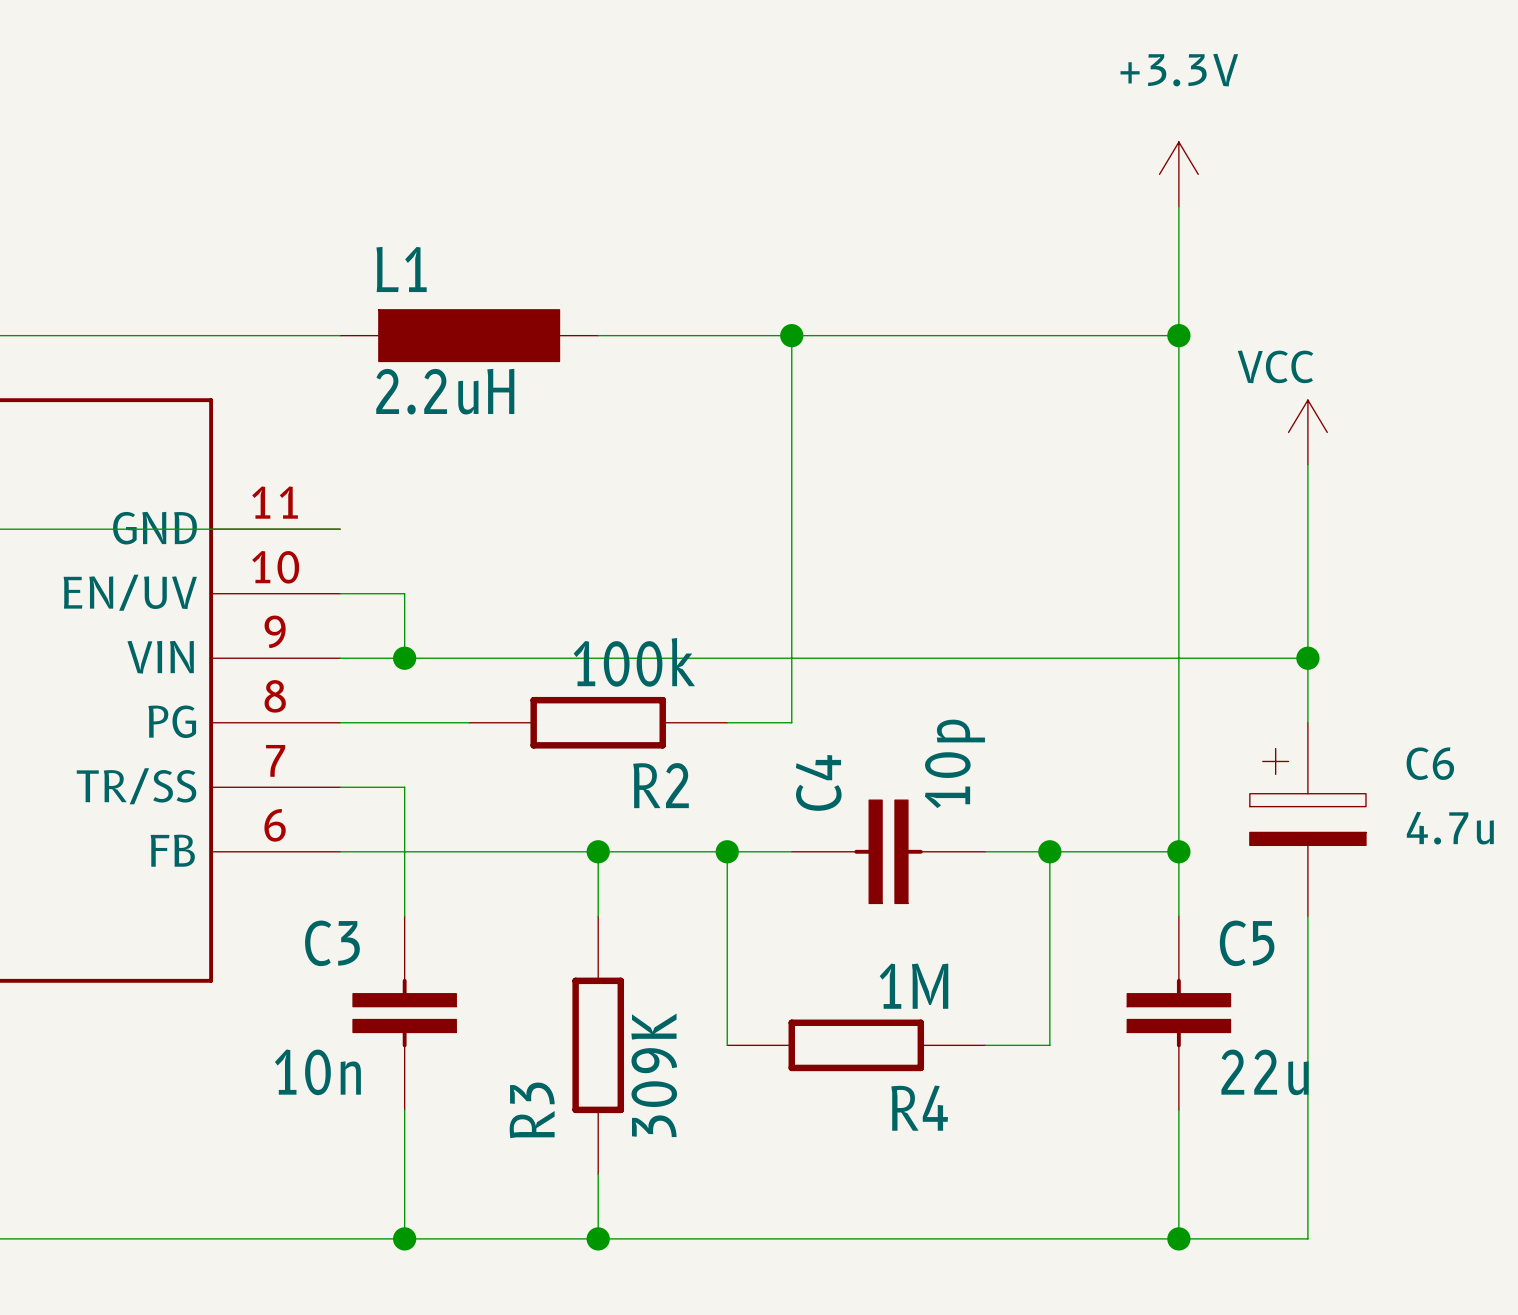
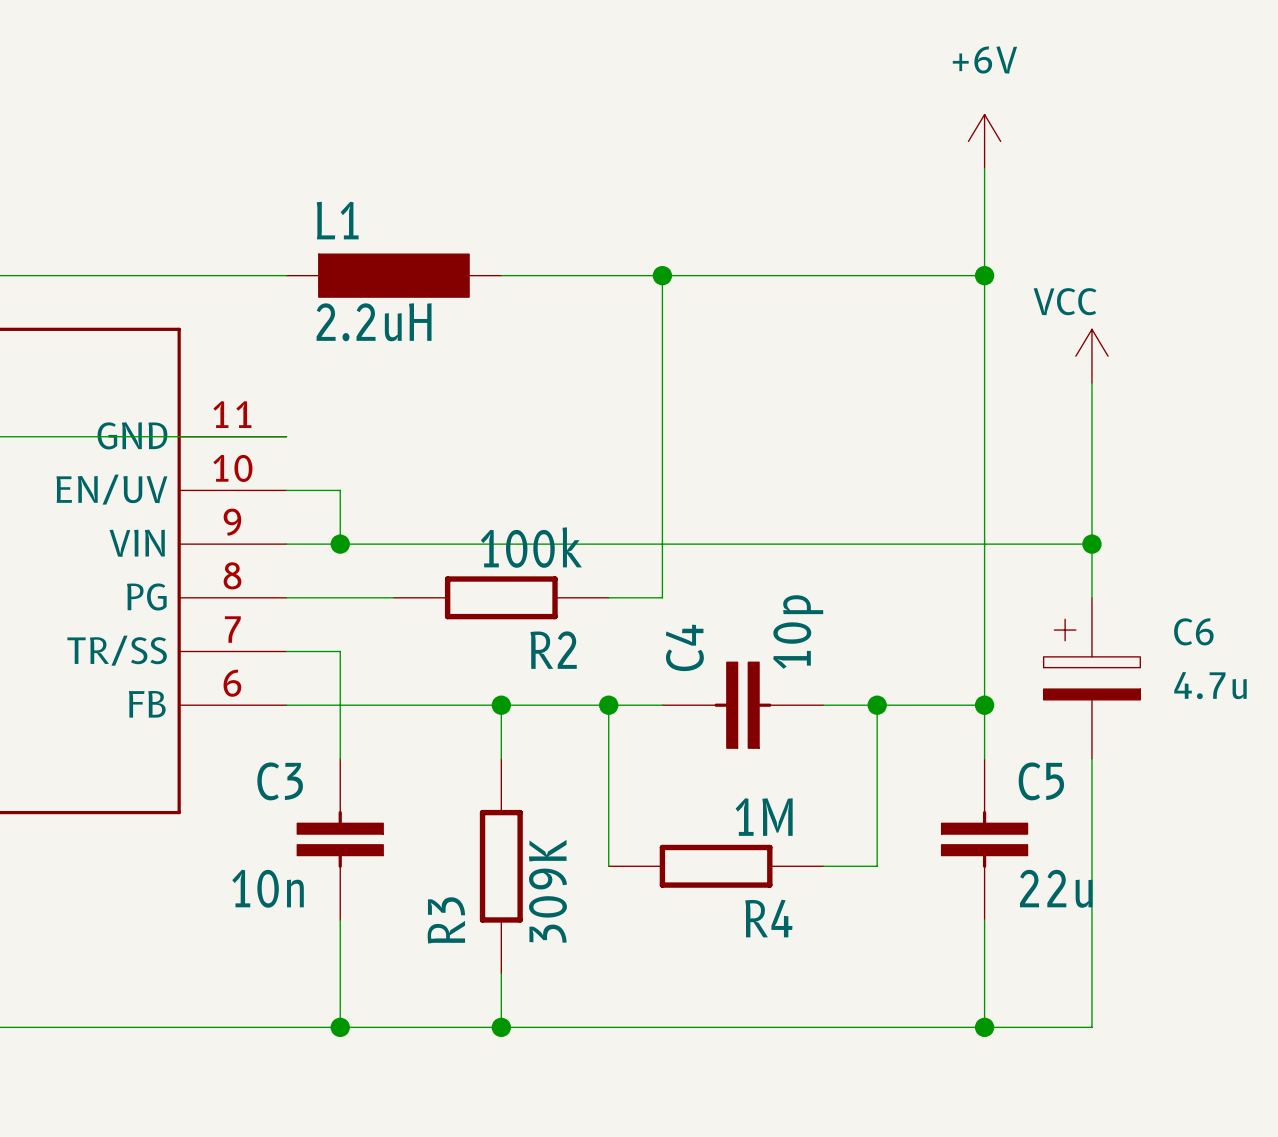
power symbol: +3.3V (1178, 174) -> +6V (984, 141)

